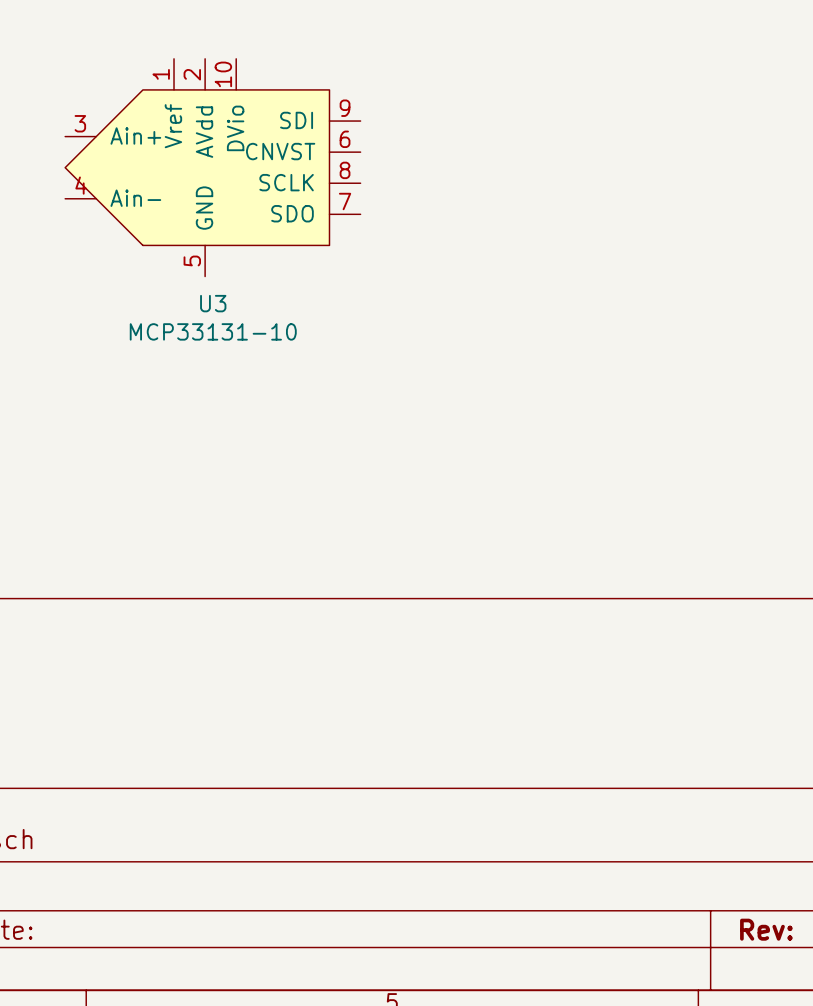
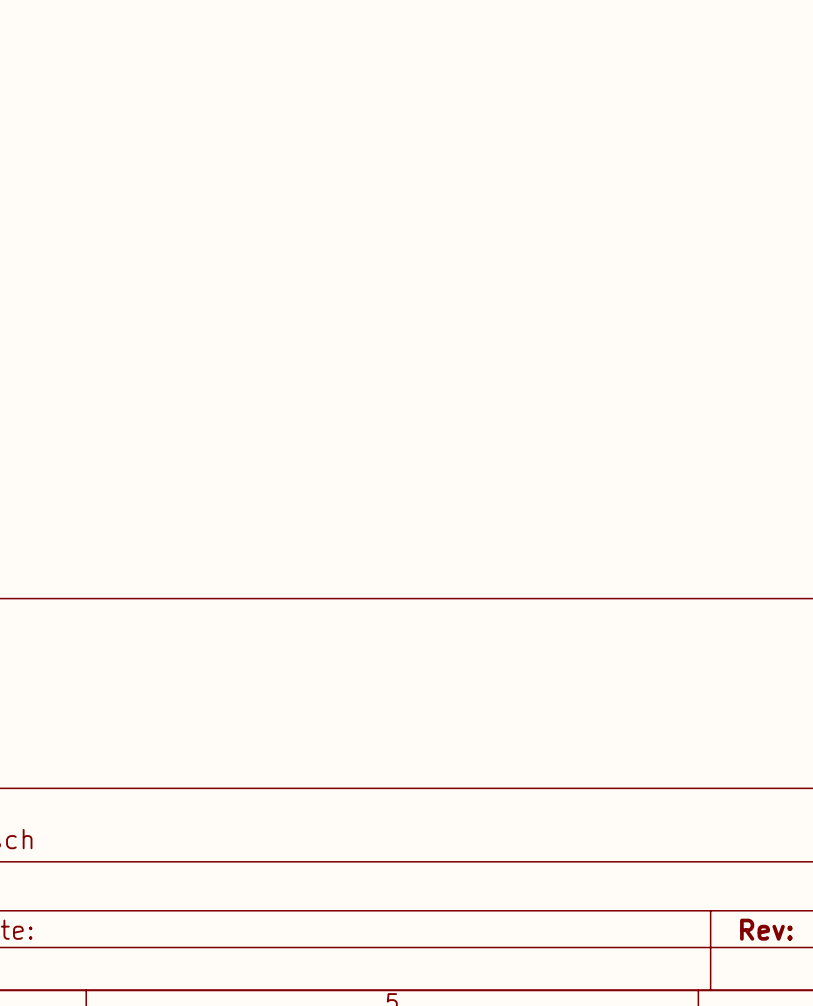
U3: MCP33131-10 (212, 167) -> none

